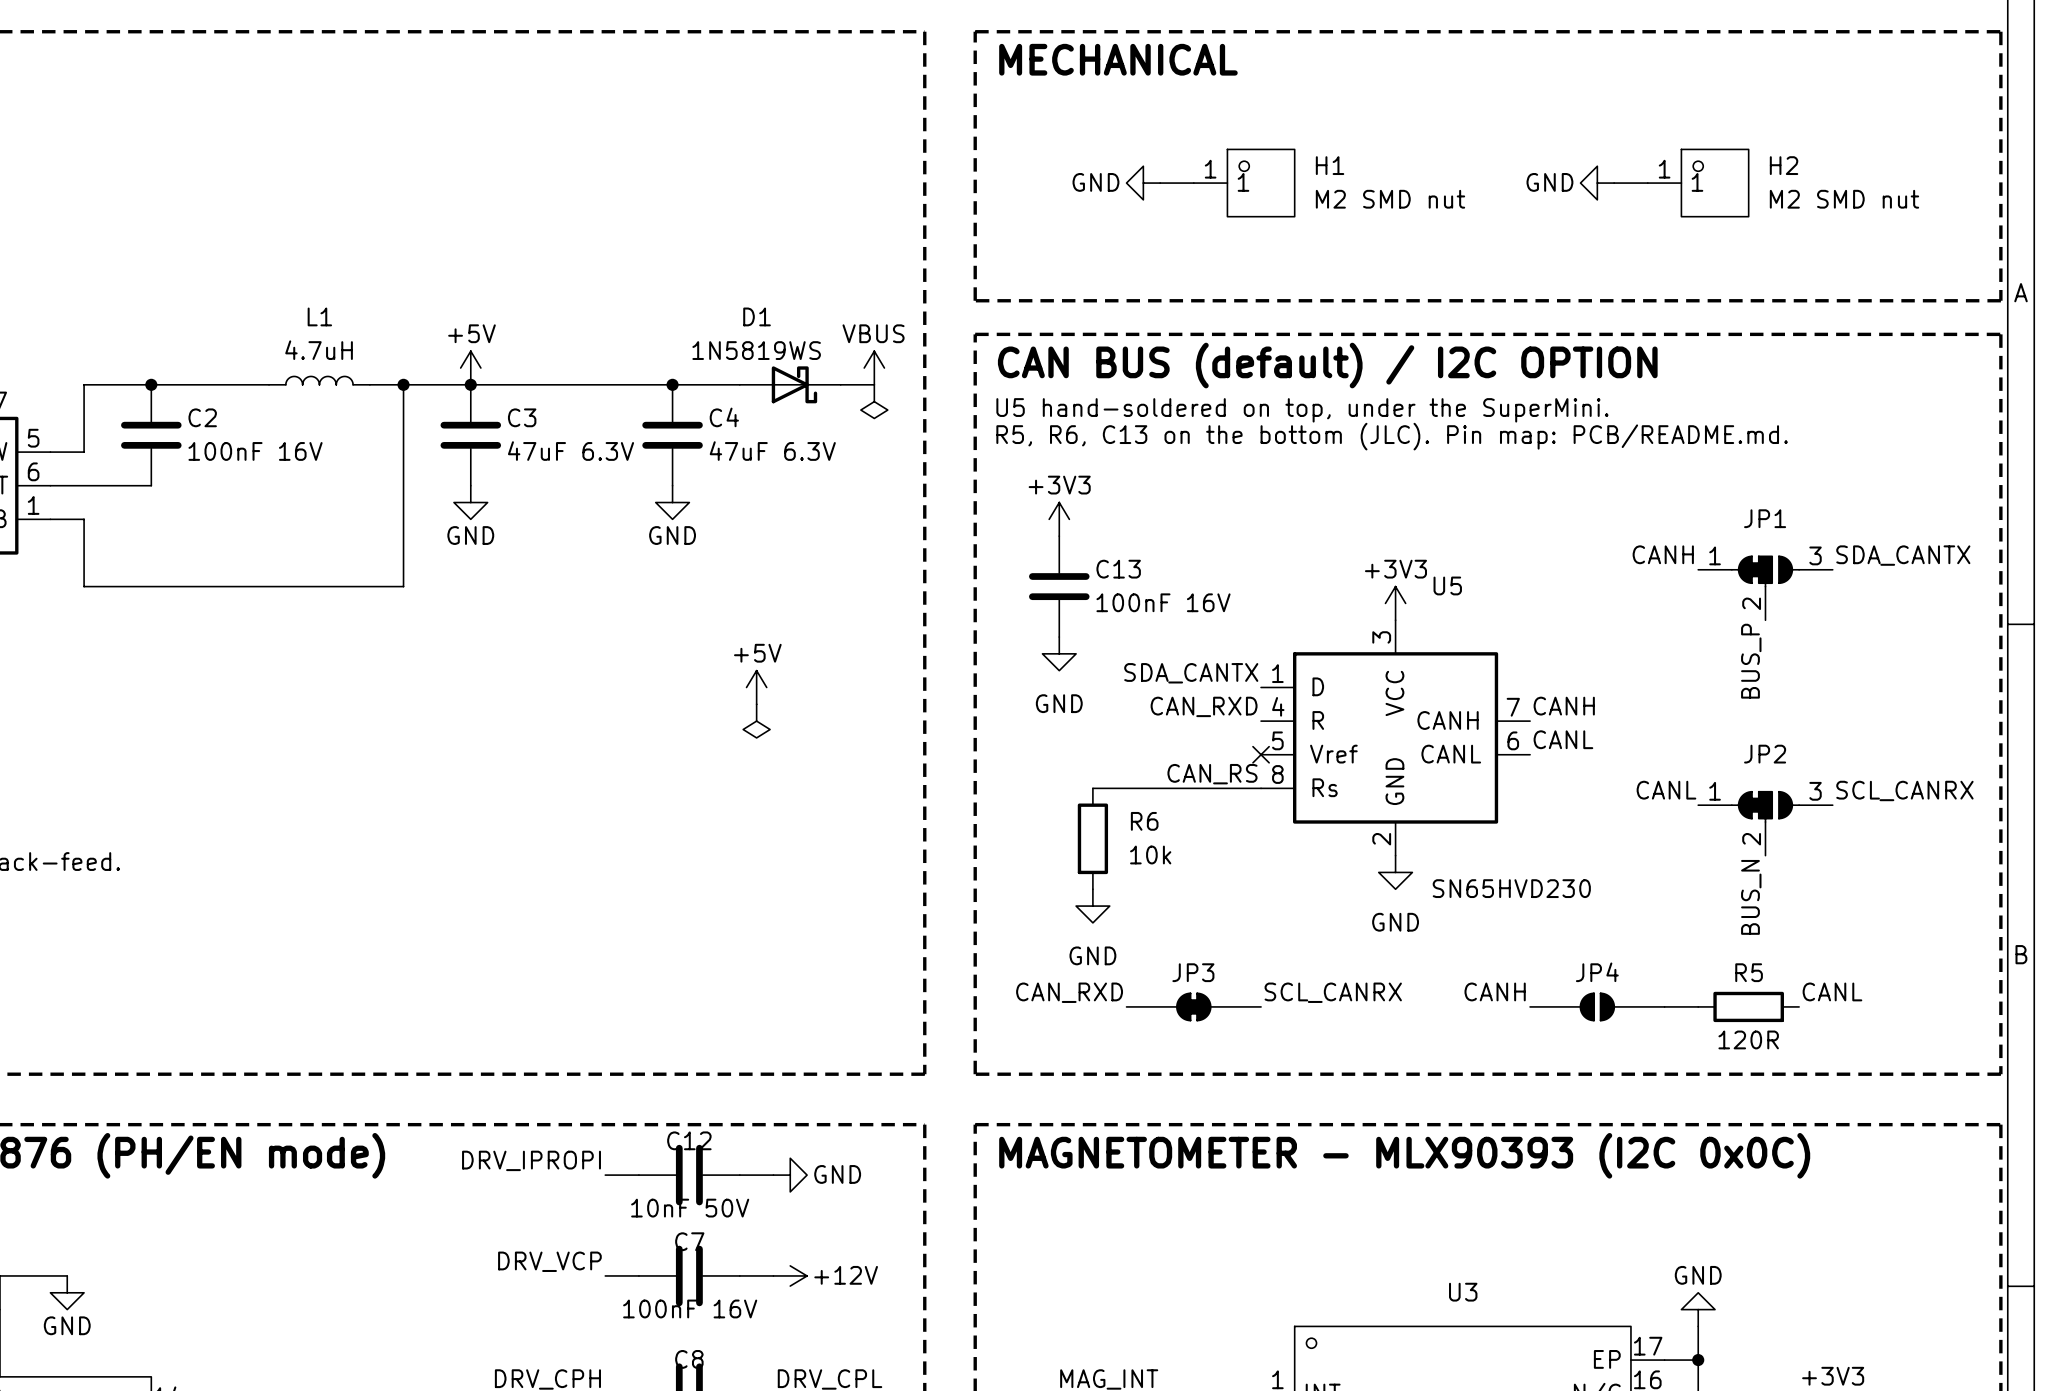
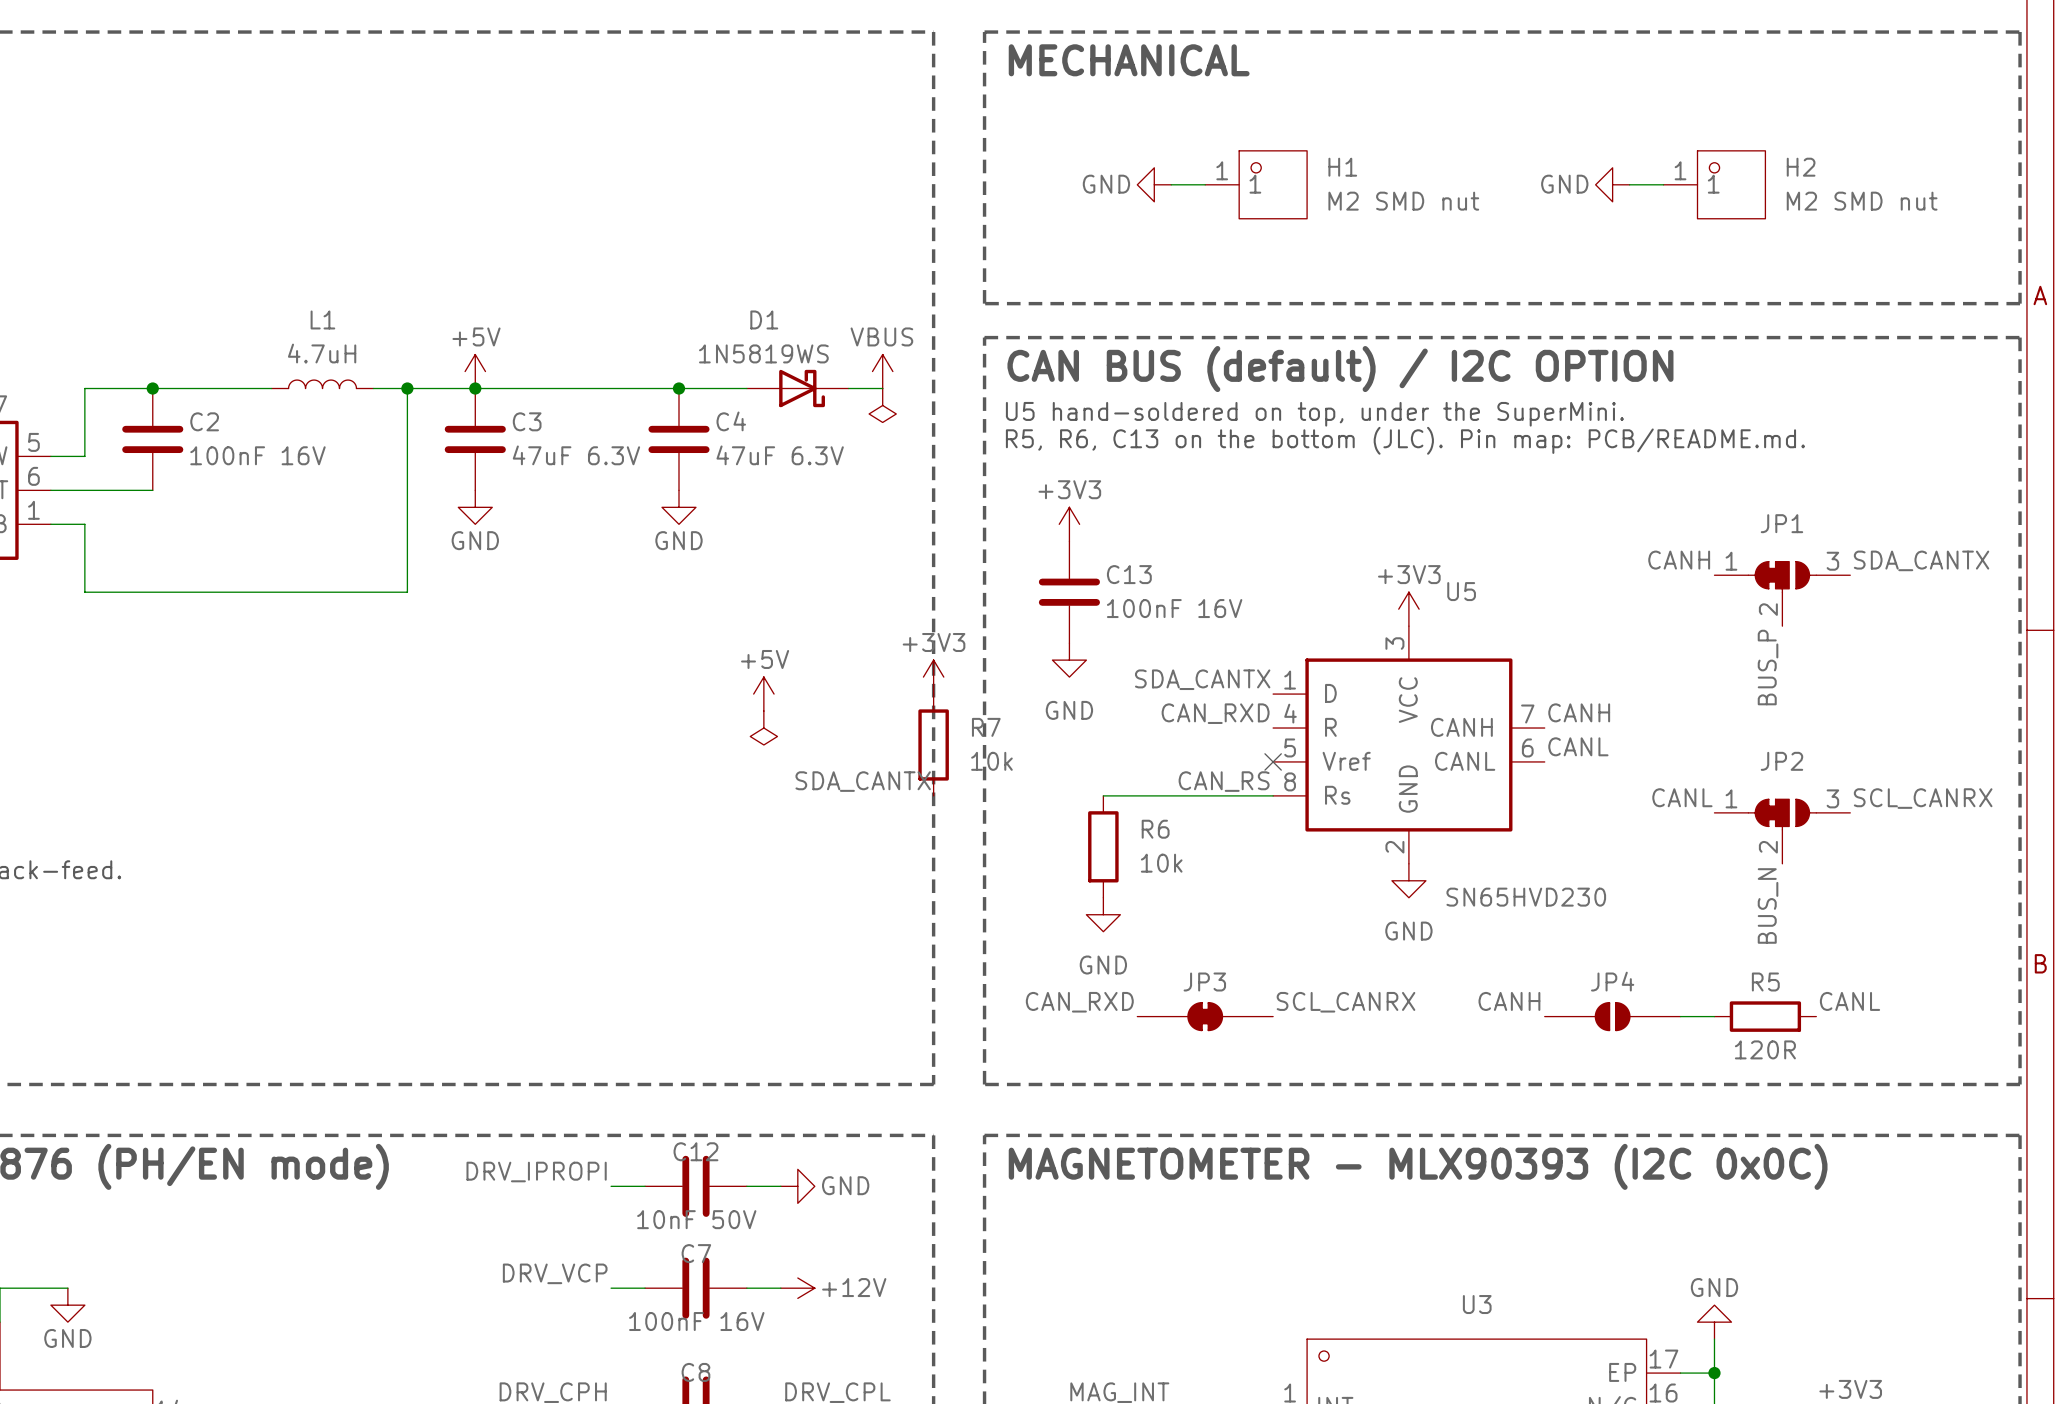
power symbol: none -> +3V3 (933, 677)
R7: none -> 10k (933, 744)
label: none -> SDA_CANTX (863, 781)

